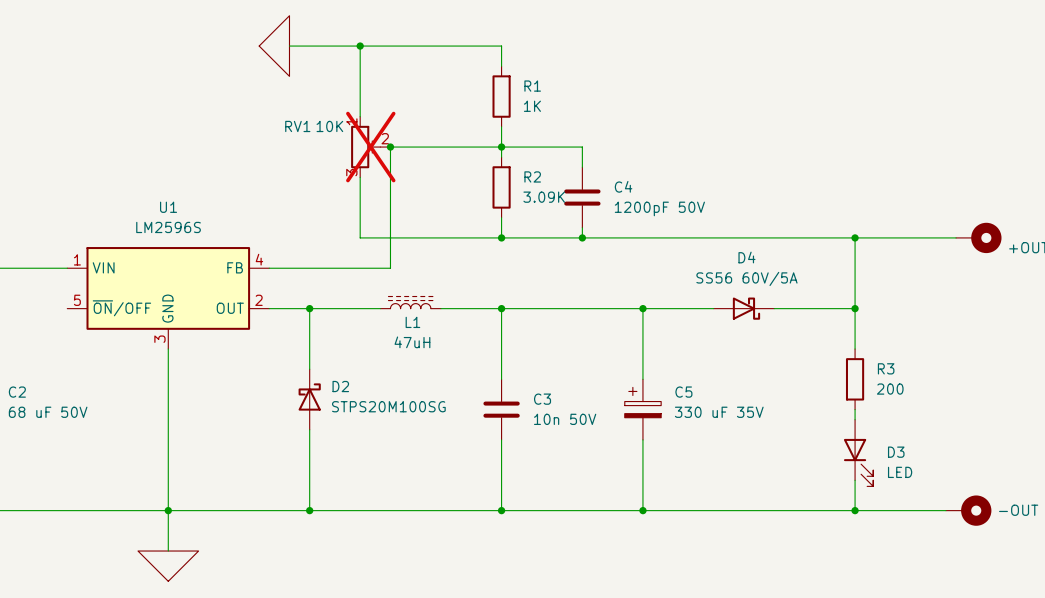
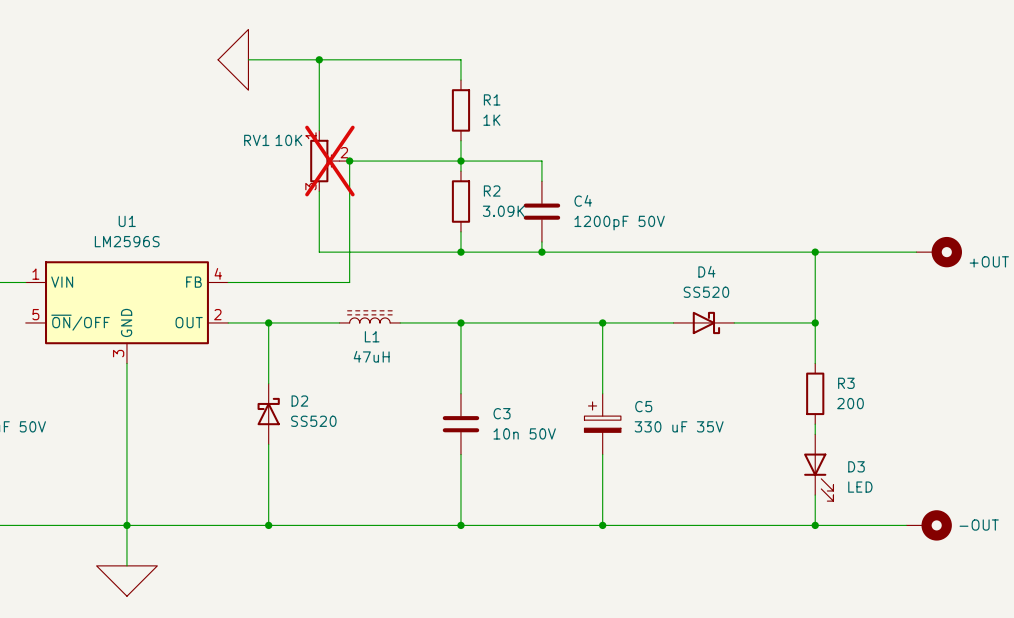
D4 value: SS56 60V/5A (746, 278) -> SS520 (706, 292)
D2 value: STPS20M100SG (388, 406) -> SS520 (313, 421)

